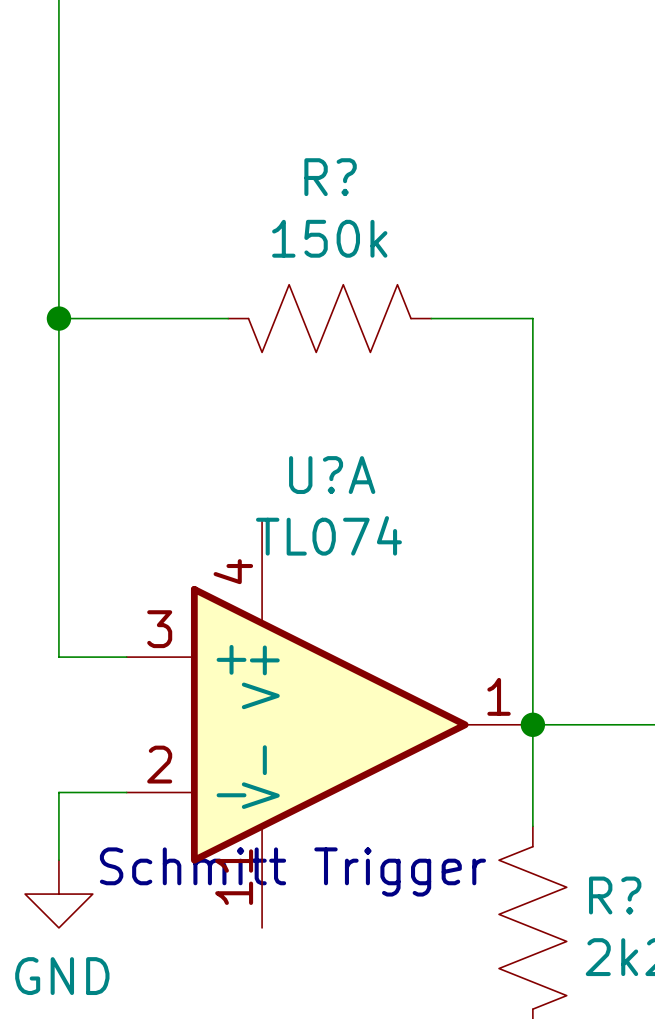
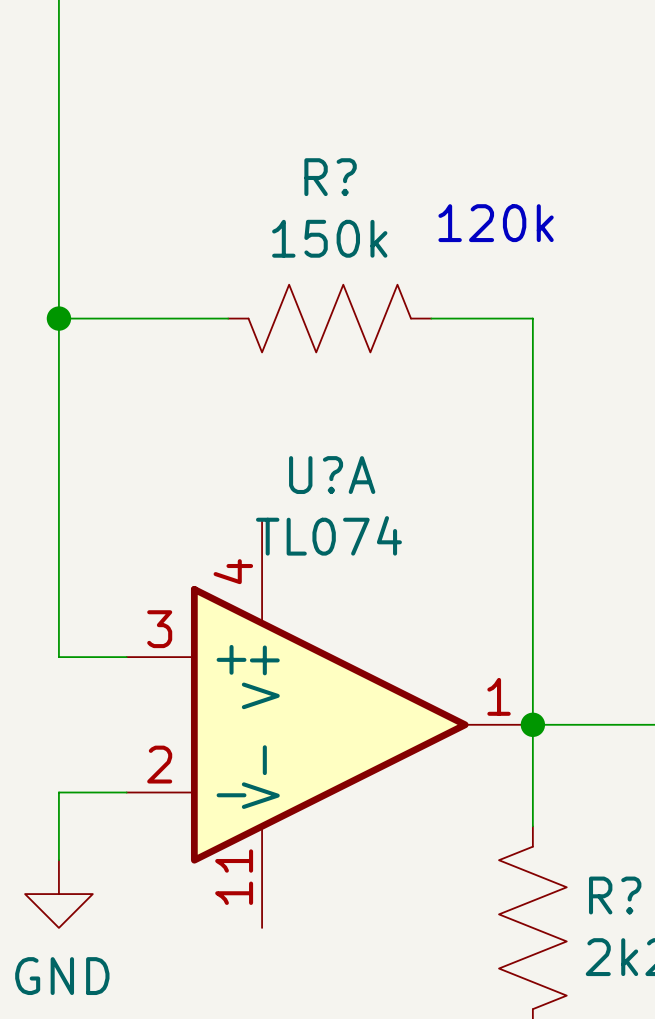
text: none -> 120k (496, 223)
text: Schmitt Trigger (292, 871) -> none

